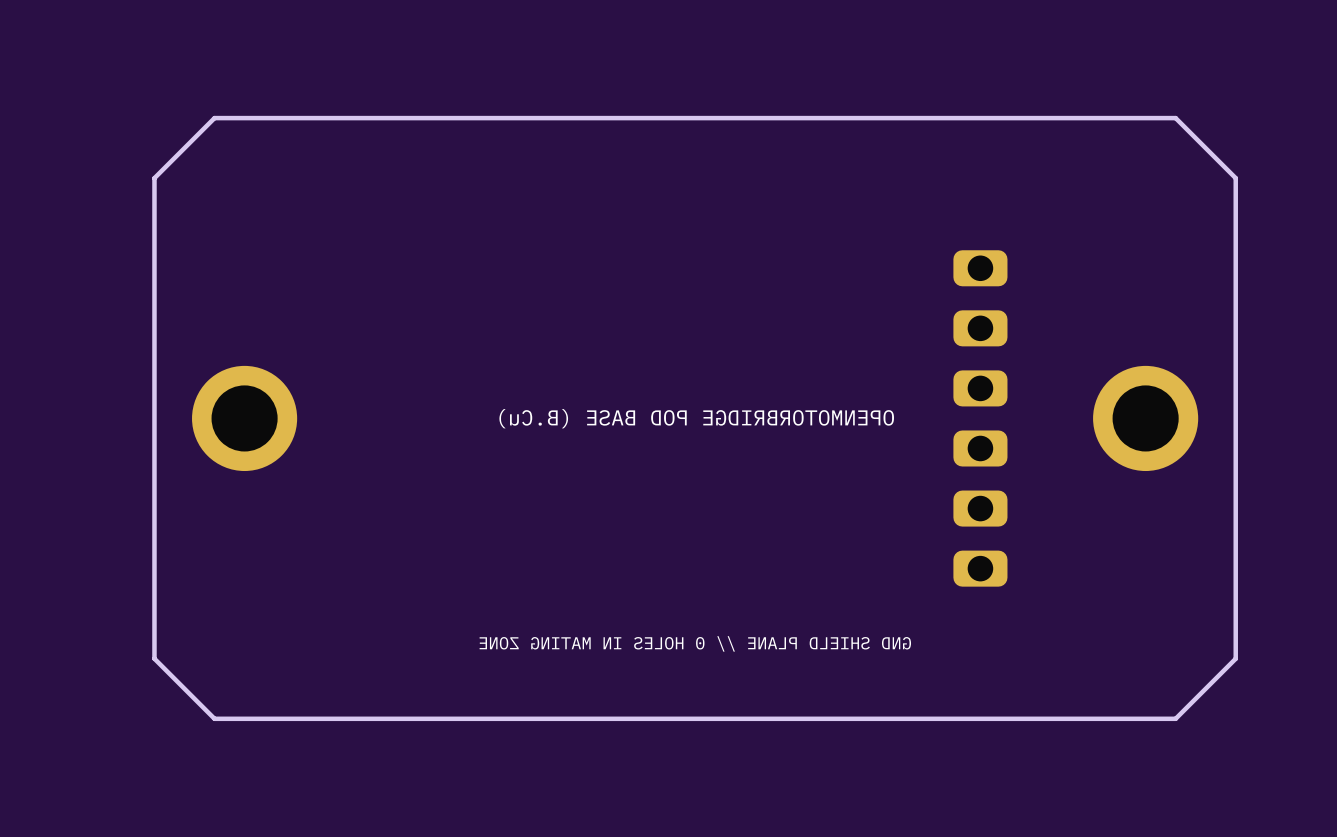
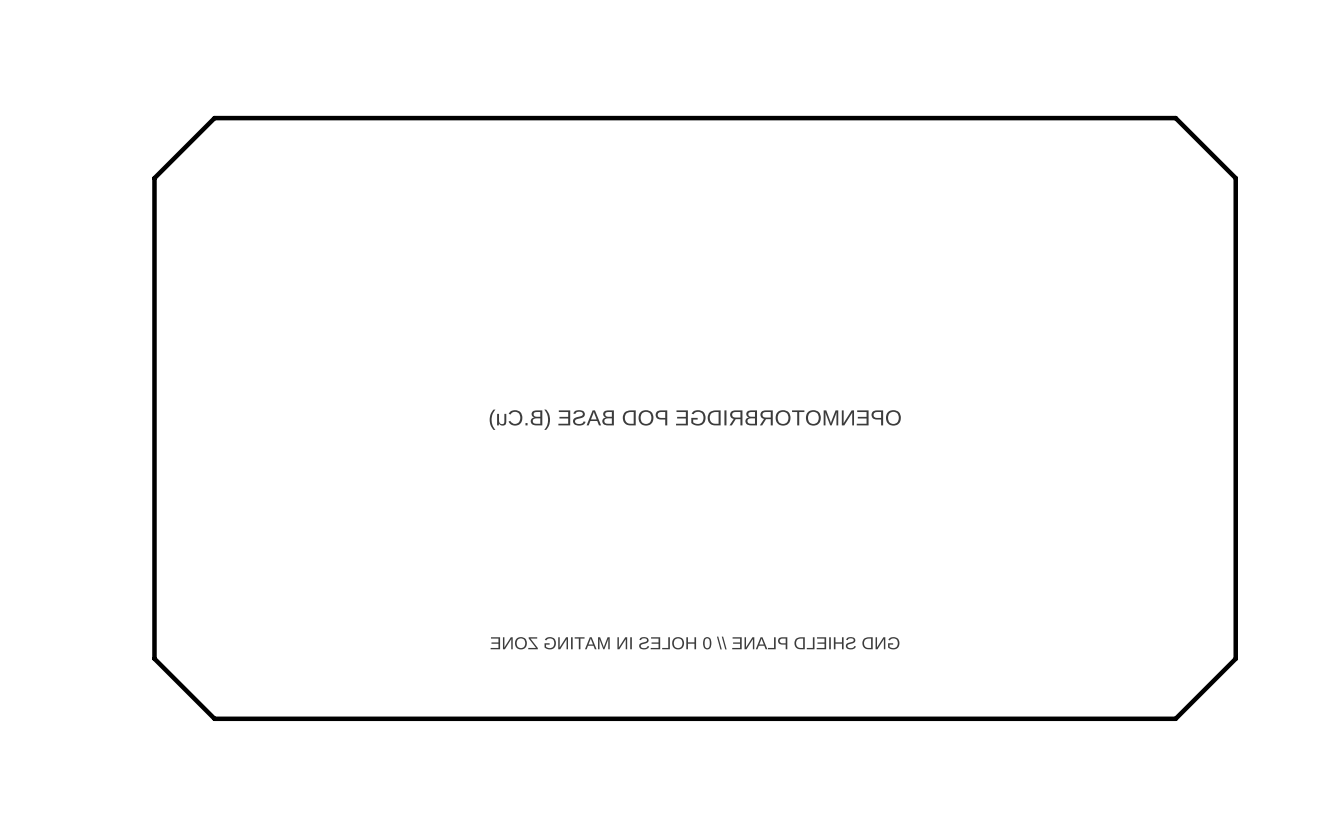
part: (244, 418) -> none
part: (980, 418) -> none
part: (1145, 418) -> none

